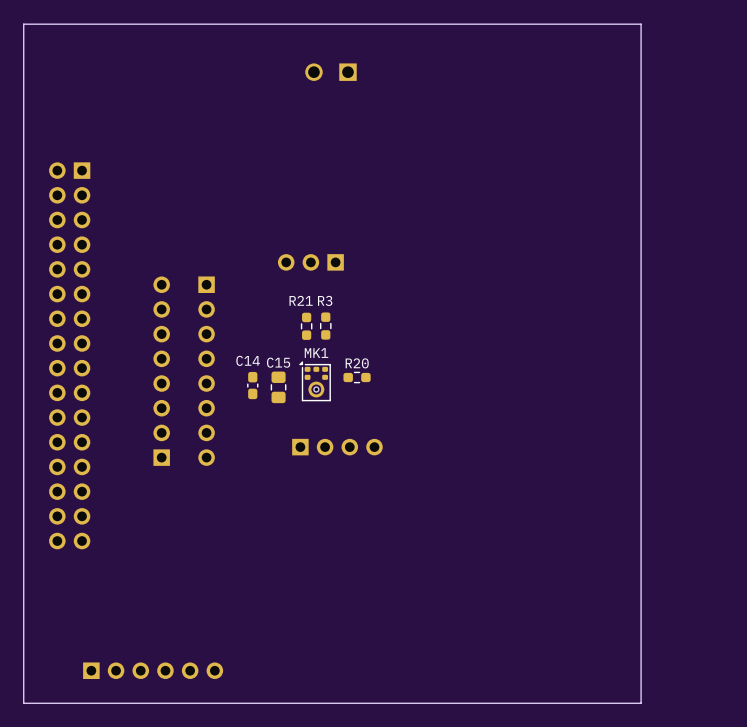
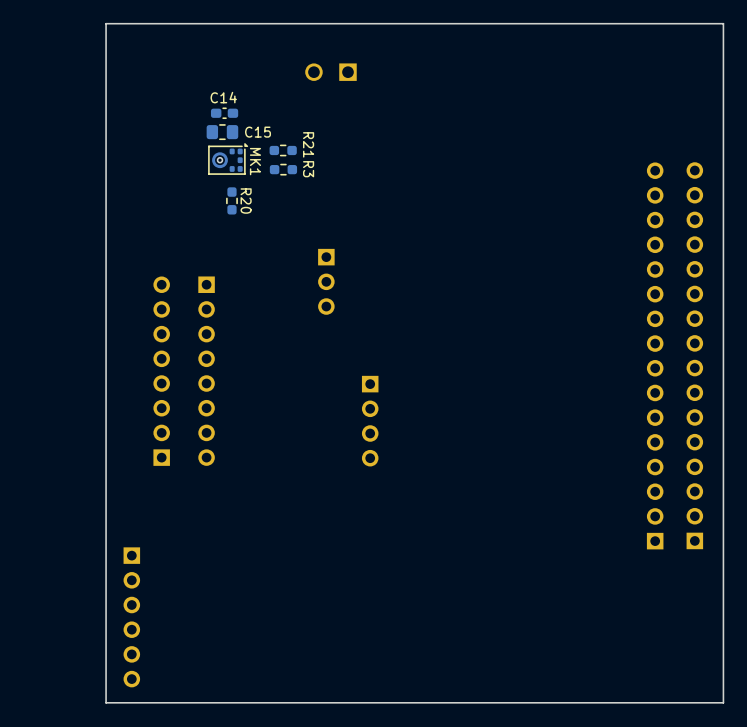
board edge: (641, 24) (23, 24) (23, 703) (641, 703) (641, 24) -> (723, 23) (106, 23) (106, 702) (723, 702) (723, 23)
part rotation: 0° (310, 262) -> 90° counterclockwise (326, 281)
R21 rotation: 0° (306, 326) -> 90° clockwise (283, 150)
R21 position: (306, 326) -> (283, 150)
R3 rotation: 0° (325, 326) -> 90° clockwise (283, 169)
R3 position: (325, 326) -> (283, 169)
part: (69, 355) -> none
part: none -> (655, 355)
part: none -> (694, 355)
R20 rotation: 0° (357, 377) -> 90° clockwise (231, 200)
R20 position: (357, 377) -> (231, 200)
MK1 rotation: 0° (314, 381) -> 90° clockwise (228, 158)
MK1 position: (314, 381) -> (228, 158)
C14 rotation: 0° (252, 385) -> 90° clockwise (224, 113)
C14 position: (252, 385) -> (224, 113)
C15 rotation: 0° (278, 387) -> 90° clockwise (222, 132)
C15 position: (278, 387) -> (222, 132)
part rotation: 0° (337, 447) -> 90° clockwise (370, 421)
part rotation: 0° (153, 670) -> 90° clockwise (131, 617)

